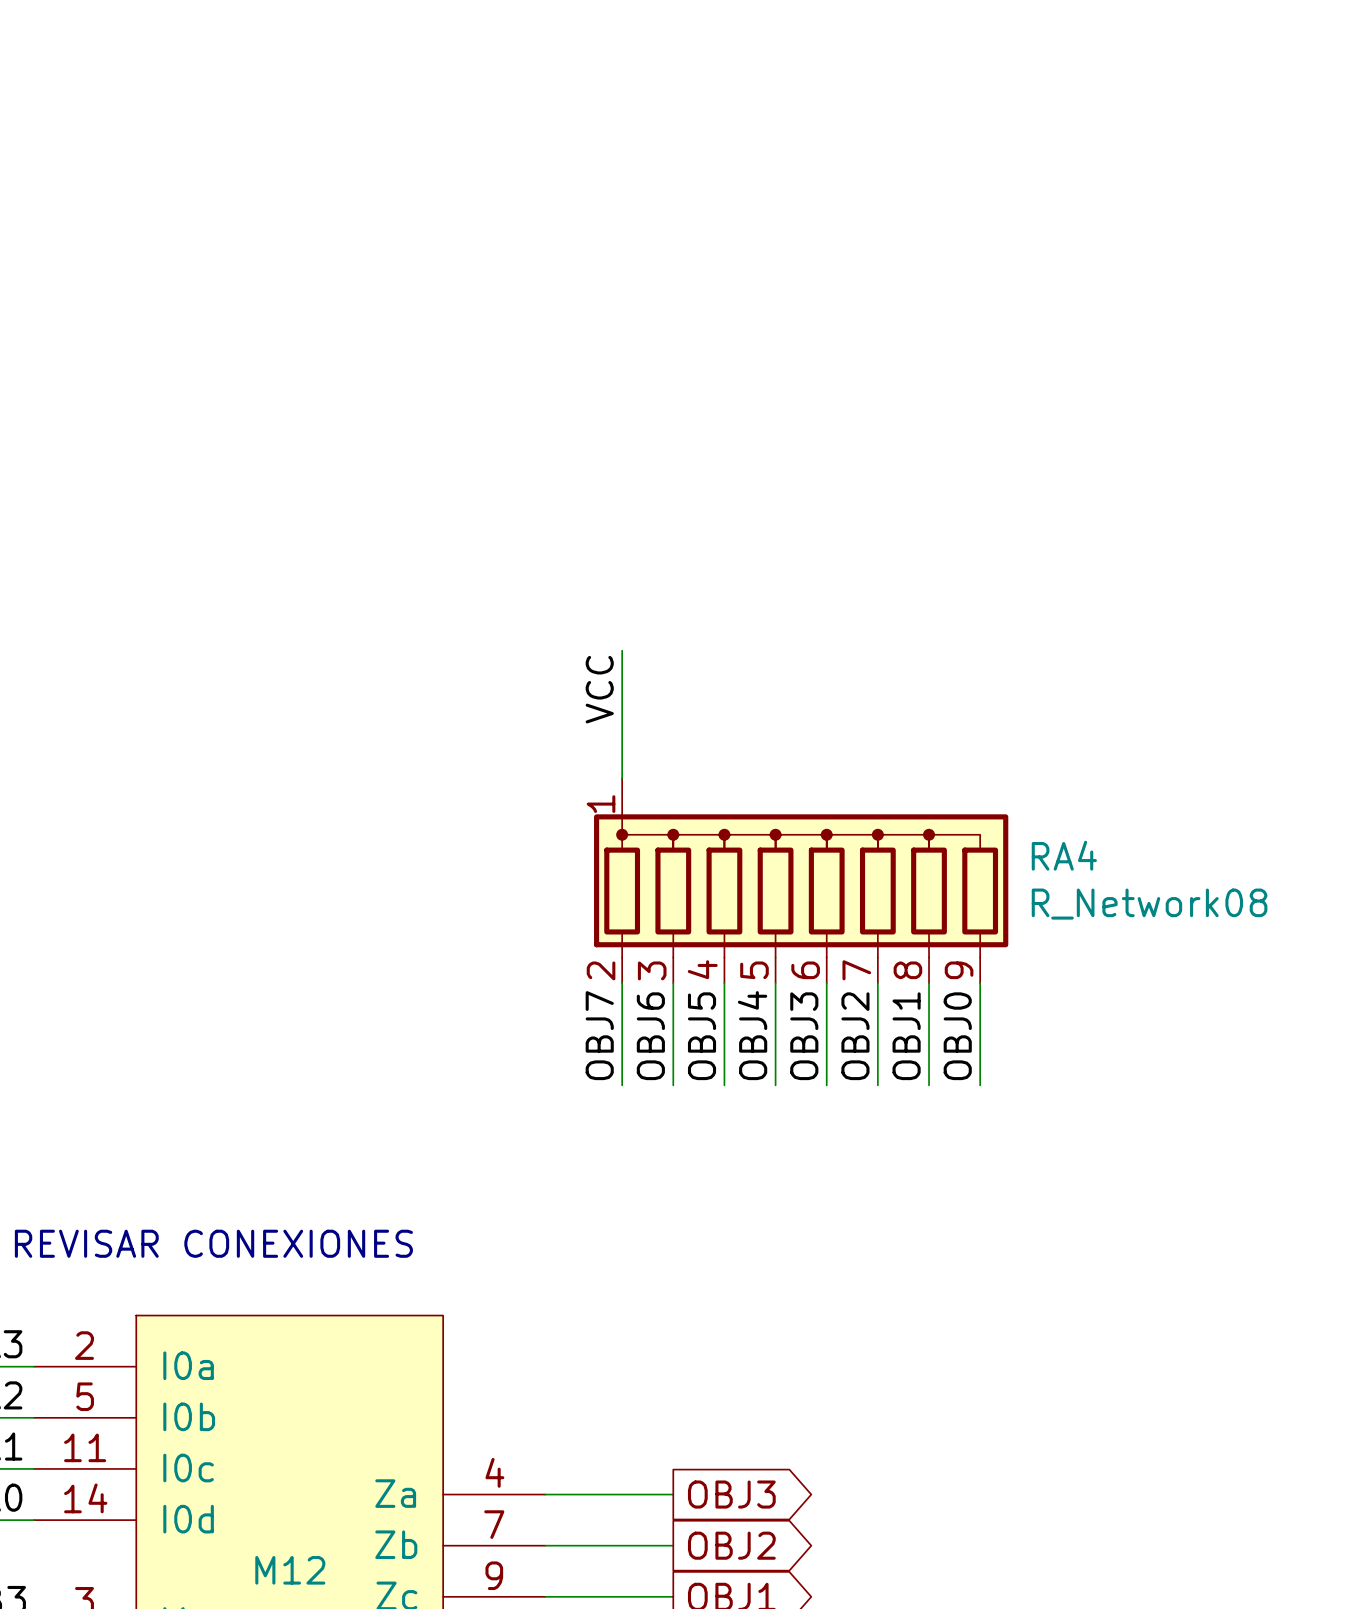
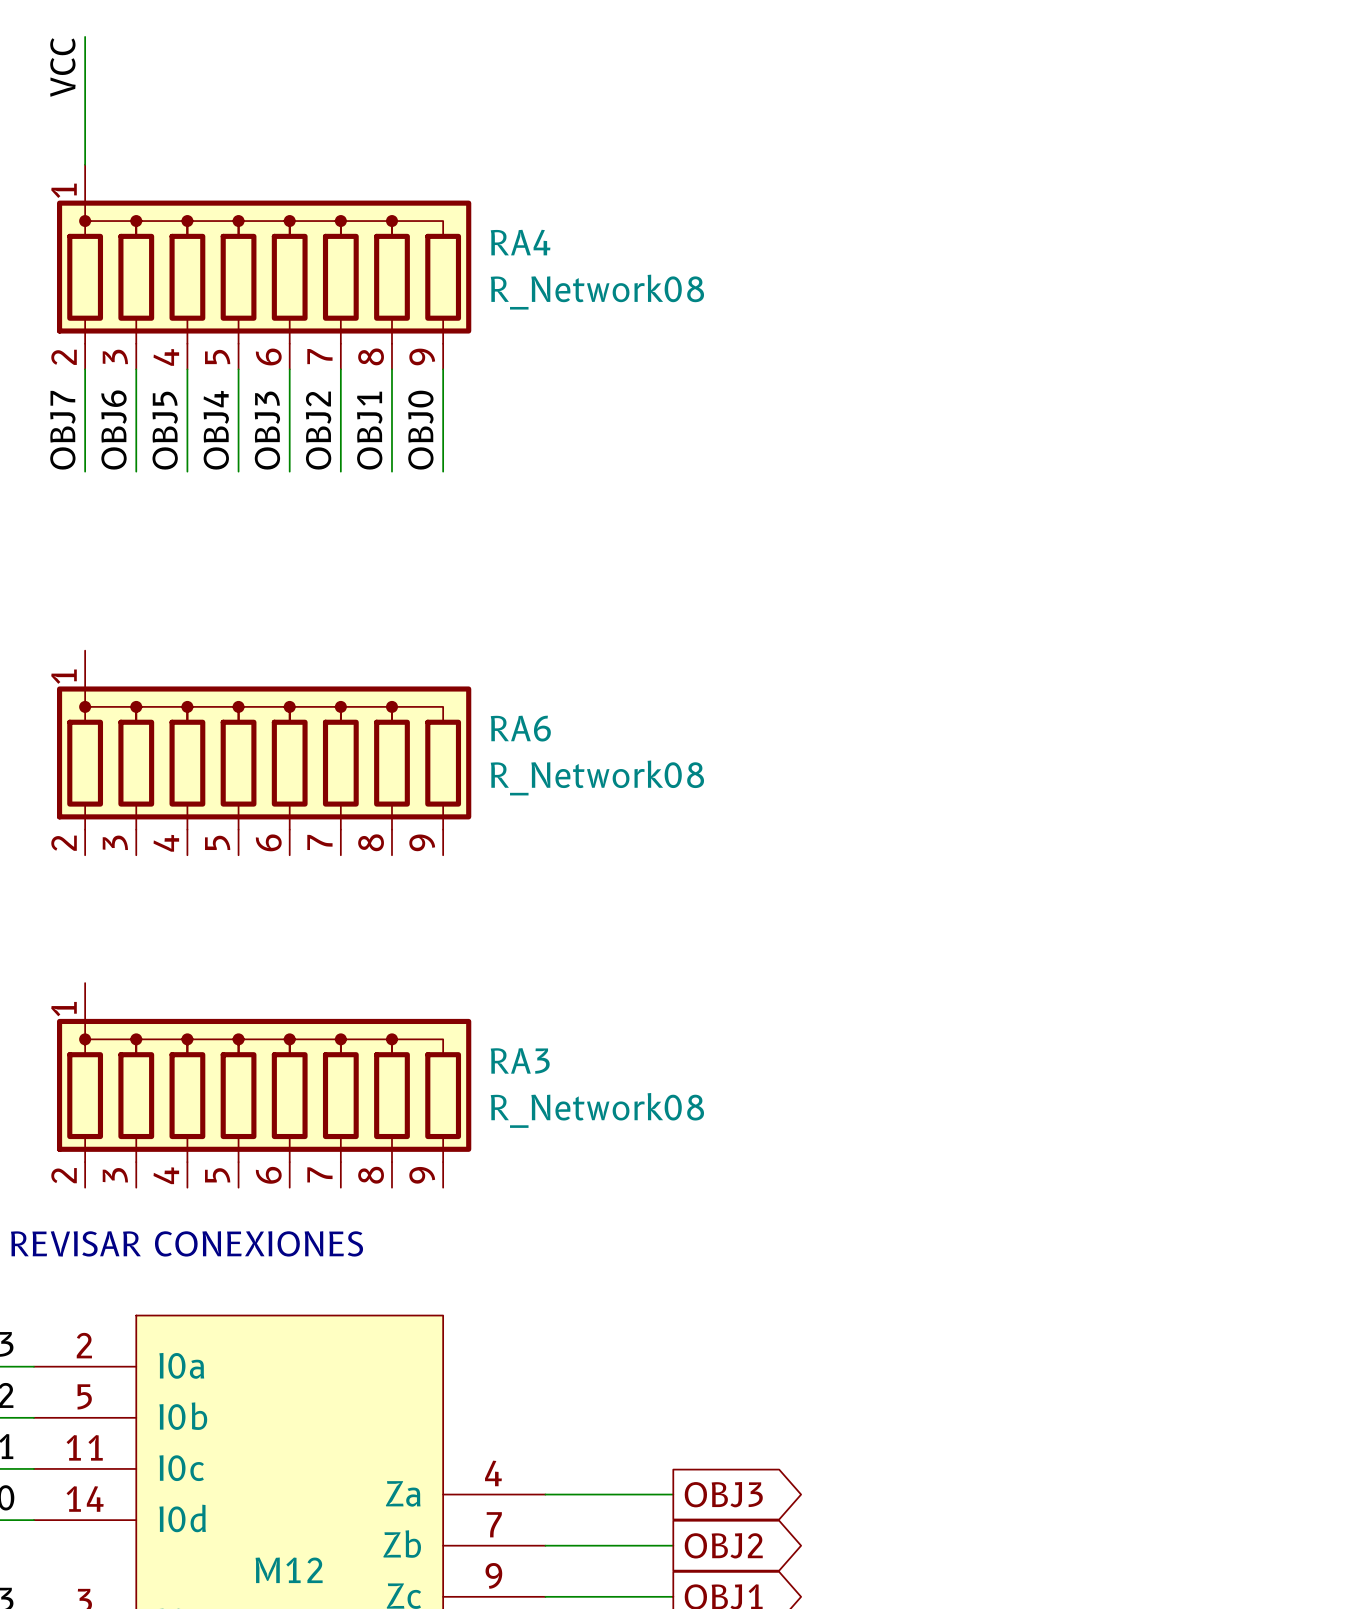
wire: none -> (85, 36) (85, 164)
label: none -> VCC (62, 67)
wire: none -> (85, 369) (85, 471)
wire: none -> (136, 369) (136, 471)
wire: none -> (187, 369) (187, 471)
wire: none -> (238, 369) (238, 471)
wire: none -> (289, 369) (289, 471)
wire: none -> (340, 369) (340, 471)
wire: none -> (391, 369) (391, 471)
wire: none -> (443, 369) (443, 471)
label: none -> OBJ7 (62, 430)
label: none -> OBJ4 (216, 430)
label: none -> OBJ6 (113, 430)
label: none -> OBJ5 (165, 430)
label: none -> OBJ3 (267, 430)
label: none -> OBJ2 (318, 430)
label: none -> OBJ1 (369, 430)
label: none -> OBJ0 (420, 430)
wire: (622, 650) (622, 778) -> none
label: VCC (599, 689) -> none
RA6: none -> R_Network08 (264, 752)
RA4 position: (801, 880) -> (264, 267)
wire: (622, 983) (622, 1085) -> none
wire: (673, 983) (673, 1085) -> none
wire: (724, 983) (724, 1085) -> none
wire: (775, 983) (775, 1085) -> none
wire: (826, 983) (826, 1085) -> none
wire: (877, 983) (877, 1085) -> none
wire: (929, 983) (929, 1085) -> none
wire: (980, 983) (980, 1085) -> none
label: OBJ7 (599, 1035) -> none
label: OBJ4 (752, 1035) -> none
label: OBJ6 (650, 1036) -> none
label: OBJ5 (702, 1036) -> none
label: OBJ3 (804, 1036) -> none
label: OBJ2 (855, 1036) -> none
label: OBJ1 (906, 1036) -> none
label: OBJ0 (957, 1036) -> none
RA3: none -> R_Network08 (264, 1085)

